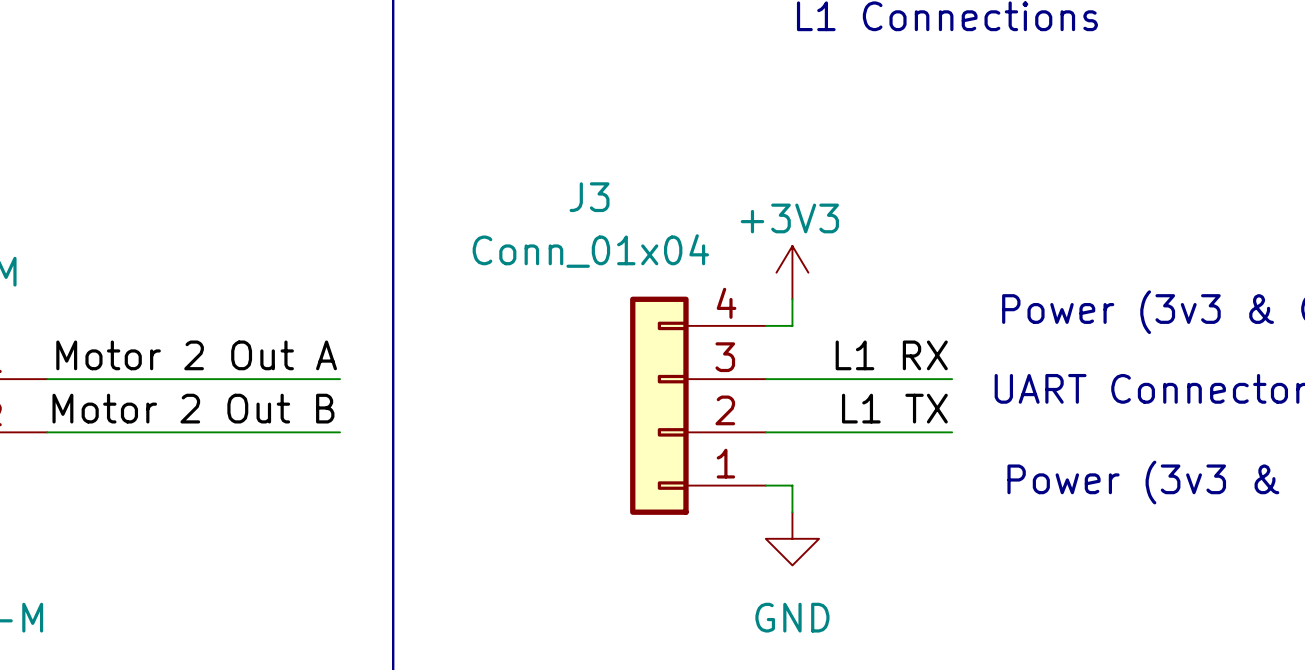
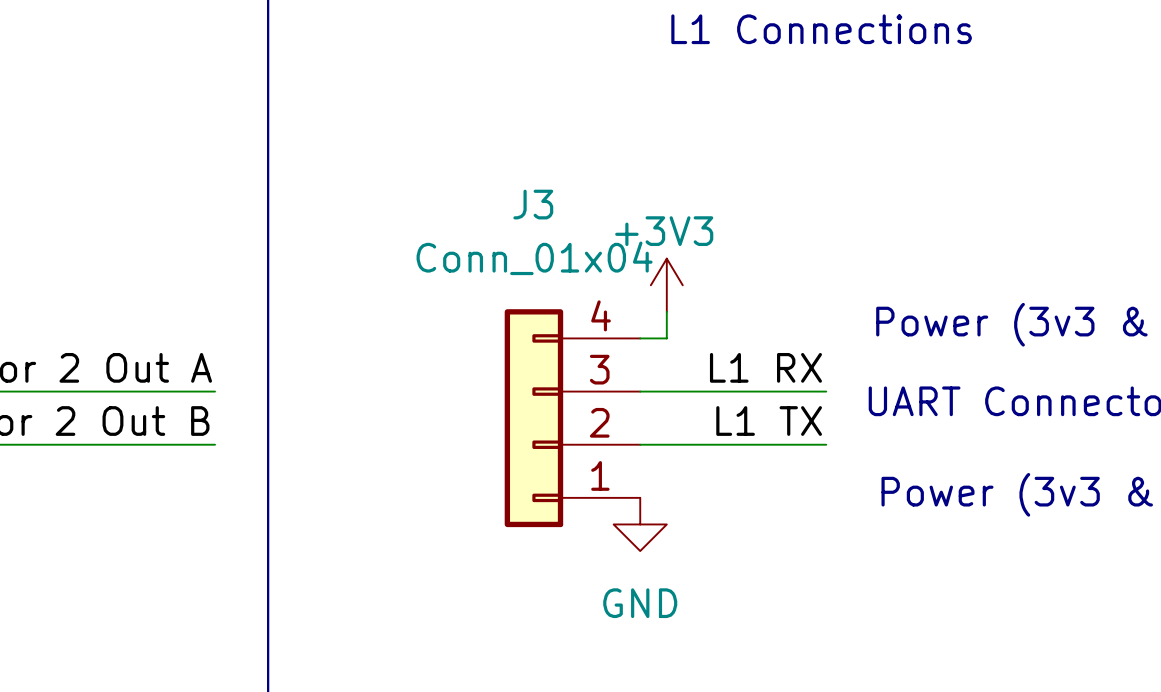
J3 name position: J3 (589, 197) -> J3 (533, 204)
J3 value position: Conn_01x04 (590, 251) -> Conn_01x04 (534, 258)
wire: (765, 485) (792, 485) (792, 512) -> none
power symbol position: GND (792, 538) -> GND (640, 524)

